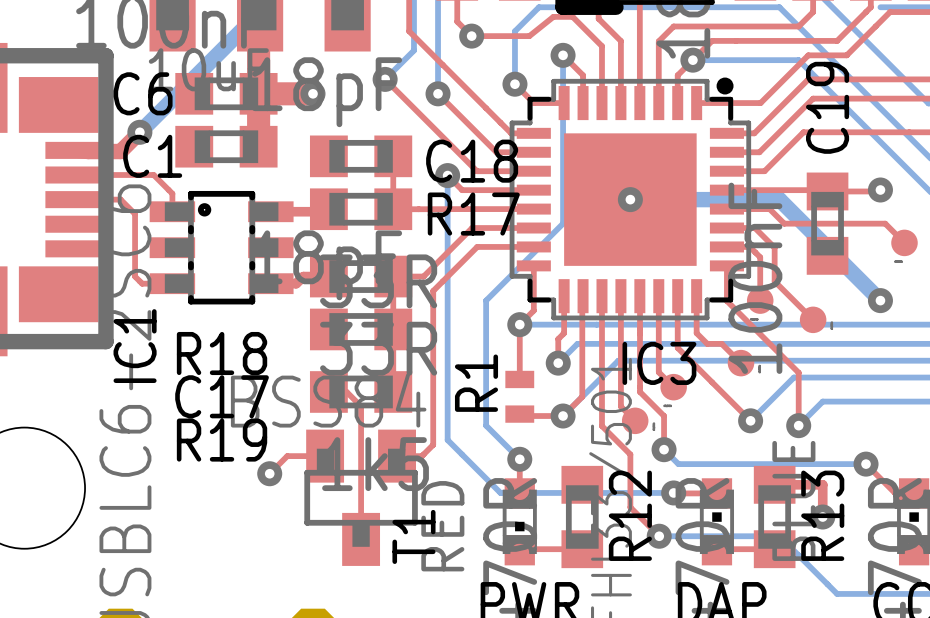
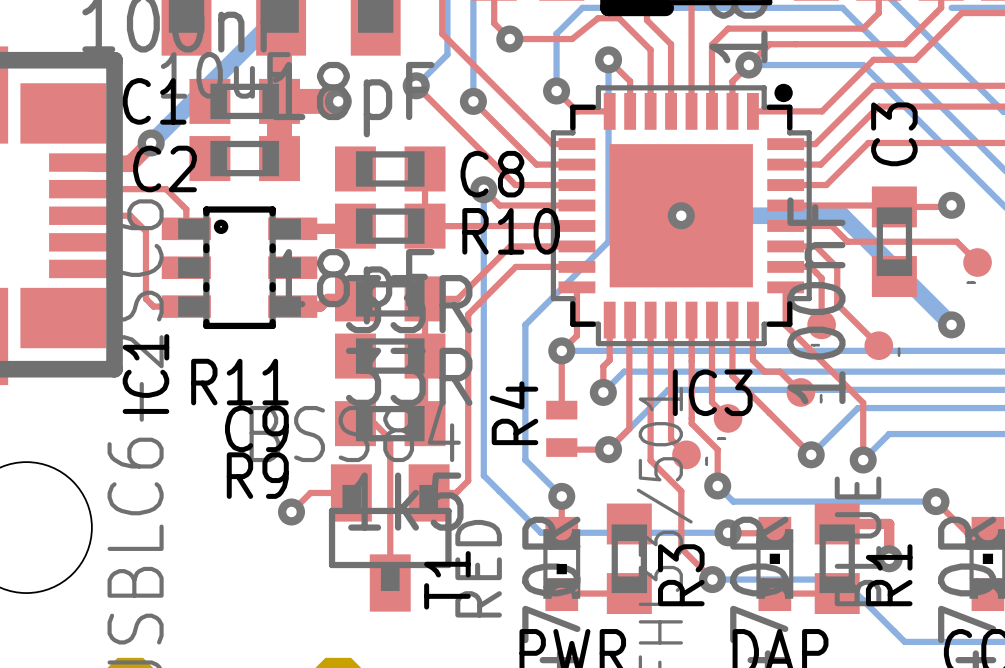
C6 name: C6 (143, 93) -> C1 (154, 101)
C19 name: C19 (827, 107) -> C3 (894, 134)
C1 name: C1 (152, 156) -> C2 (164, 168)
C18 name: C18 (472, 161) -> C8 (492, 174)
R17 name: R17 (473, 214) -> R10 (511, 231)
R18 name: R18 (222, 353) -> R11 (239, 382)
R1 name: R1 (476, 383) -> R4 (513, 413)
C17 name: C17 (222, 396) -> C9 (256, 428)
R19 name: R19 (222, 440) -> R9 (257, 475)
R12 name: R12 (630, 515) -> R3 (681, 575)
R13 name: R13 (822, 515) -> R1 (889, 575)

